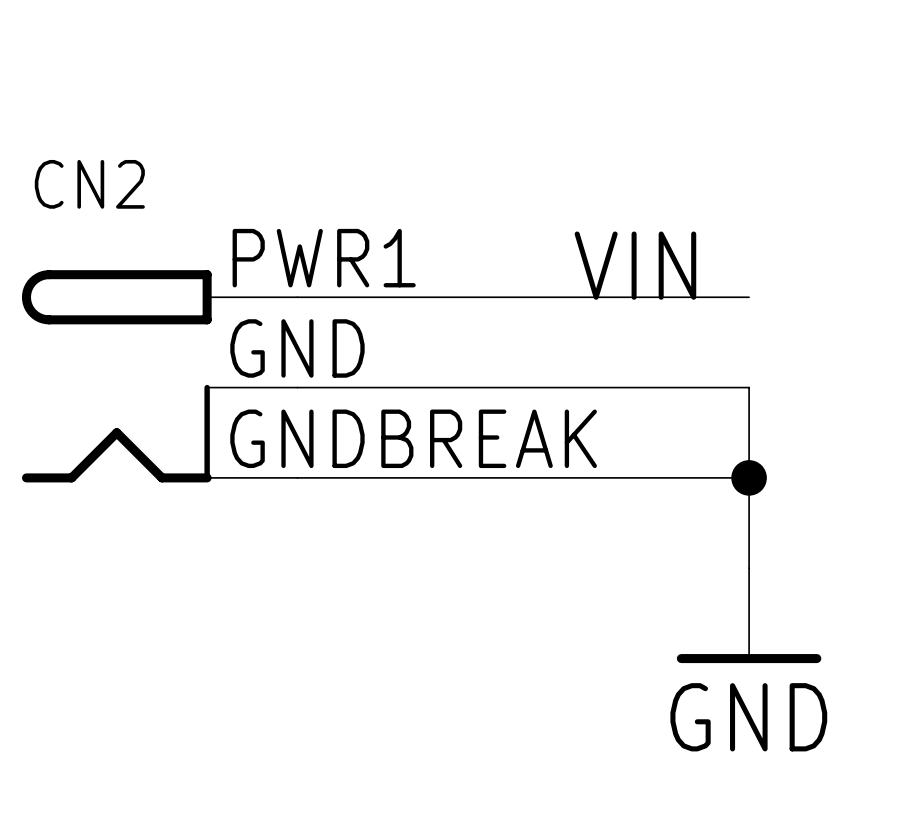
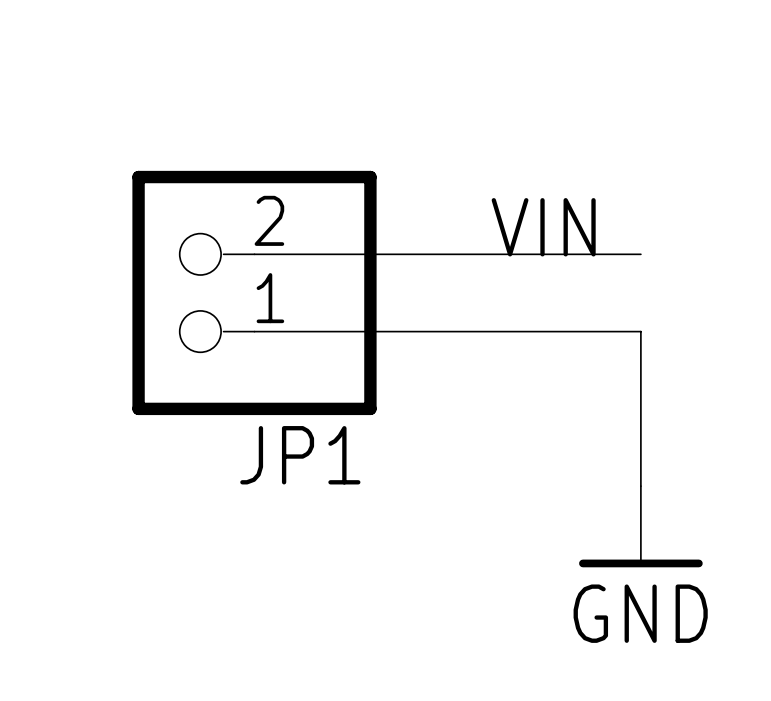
JP1: none -> (254, 292)
CN2: (159, 376) -> none
wire: (297, 477) (749, 477) -> none
junction: (749, 477) -> none

